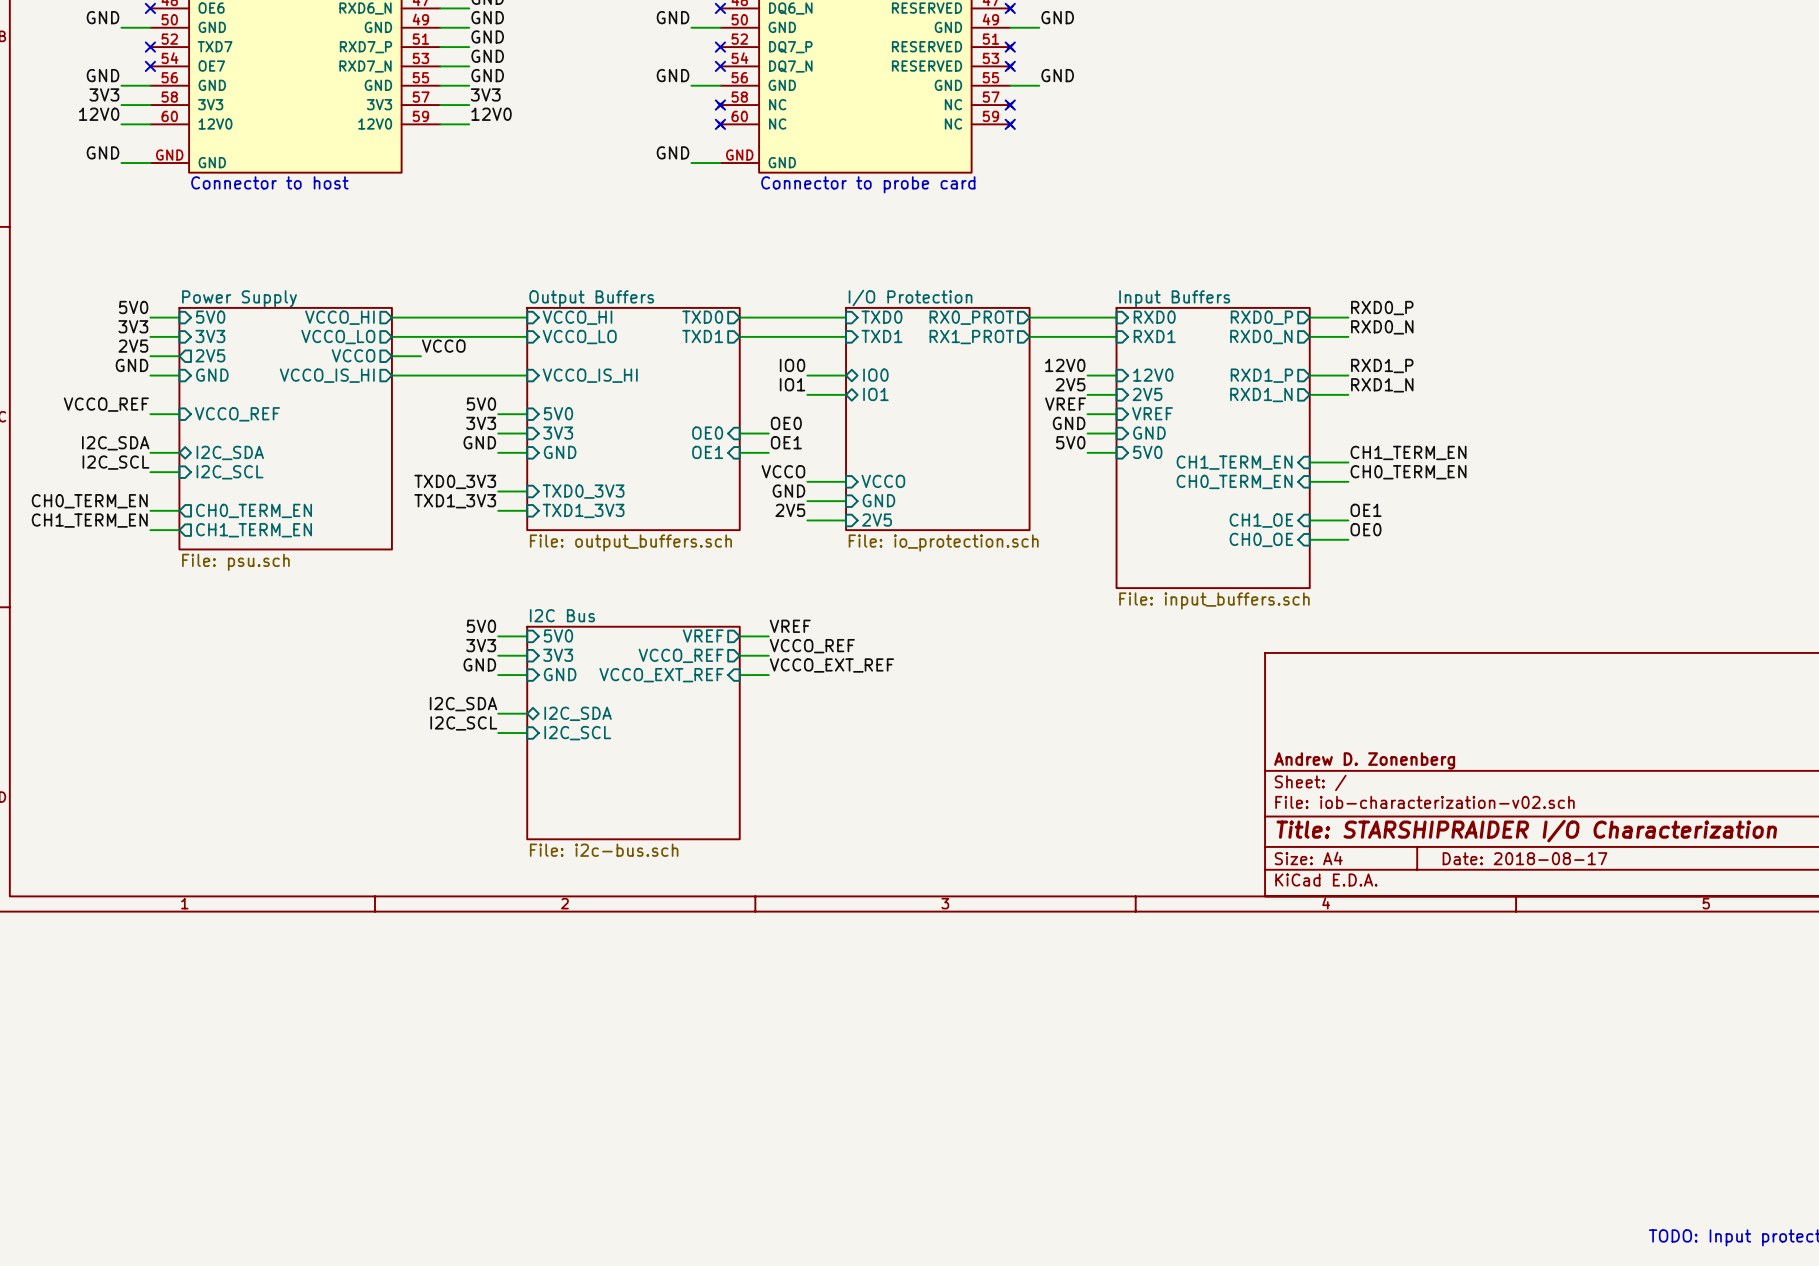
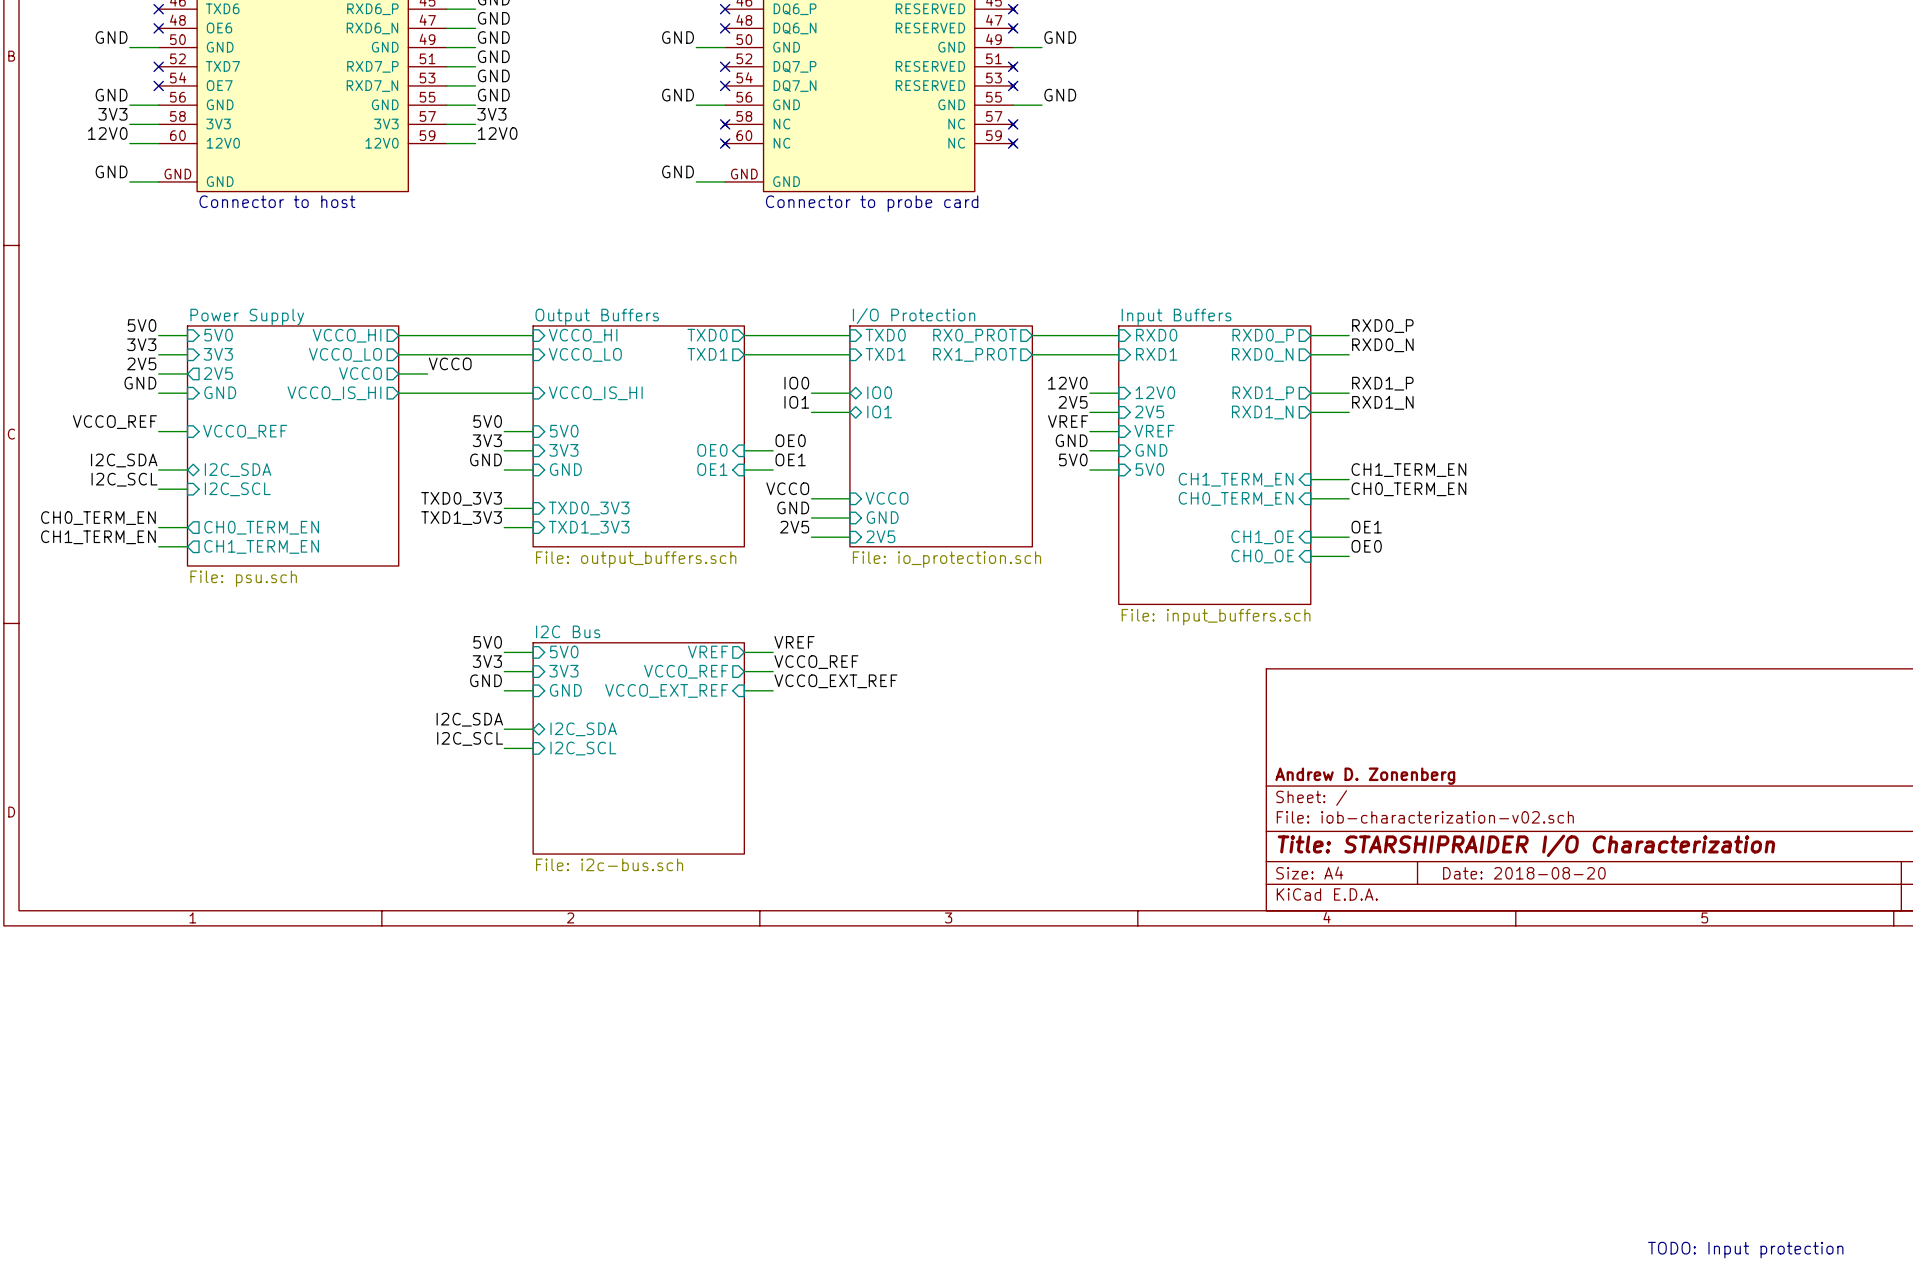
title block: Date: 2018-08-17 (1525, 858) -> Date: 2018-08-20 (1524, 873)

